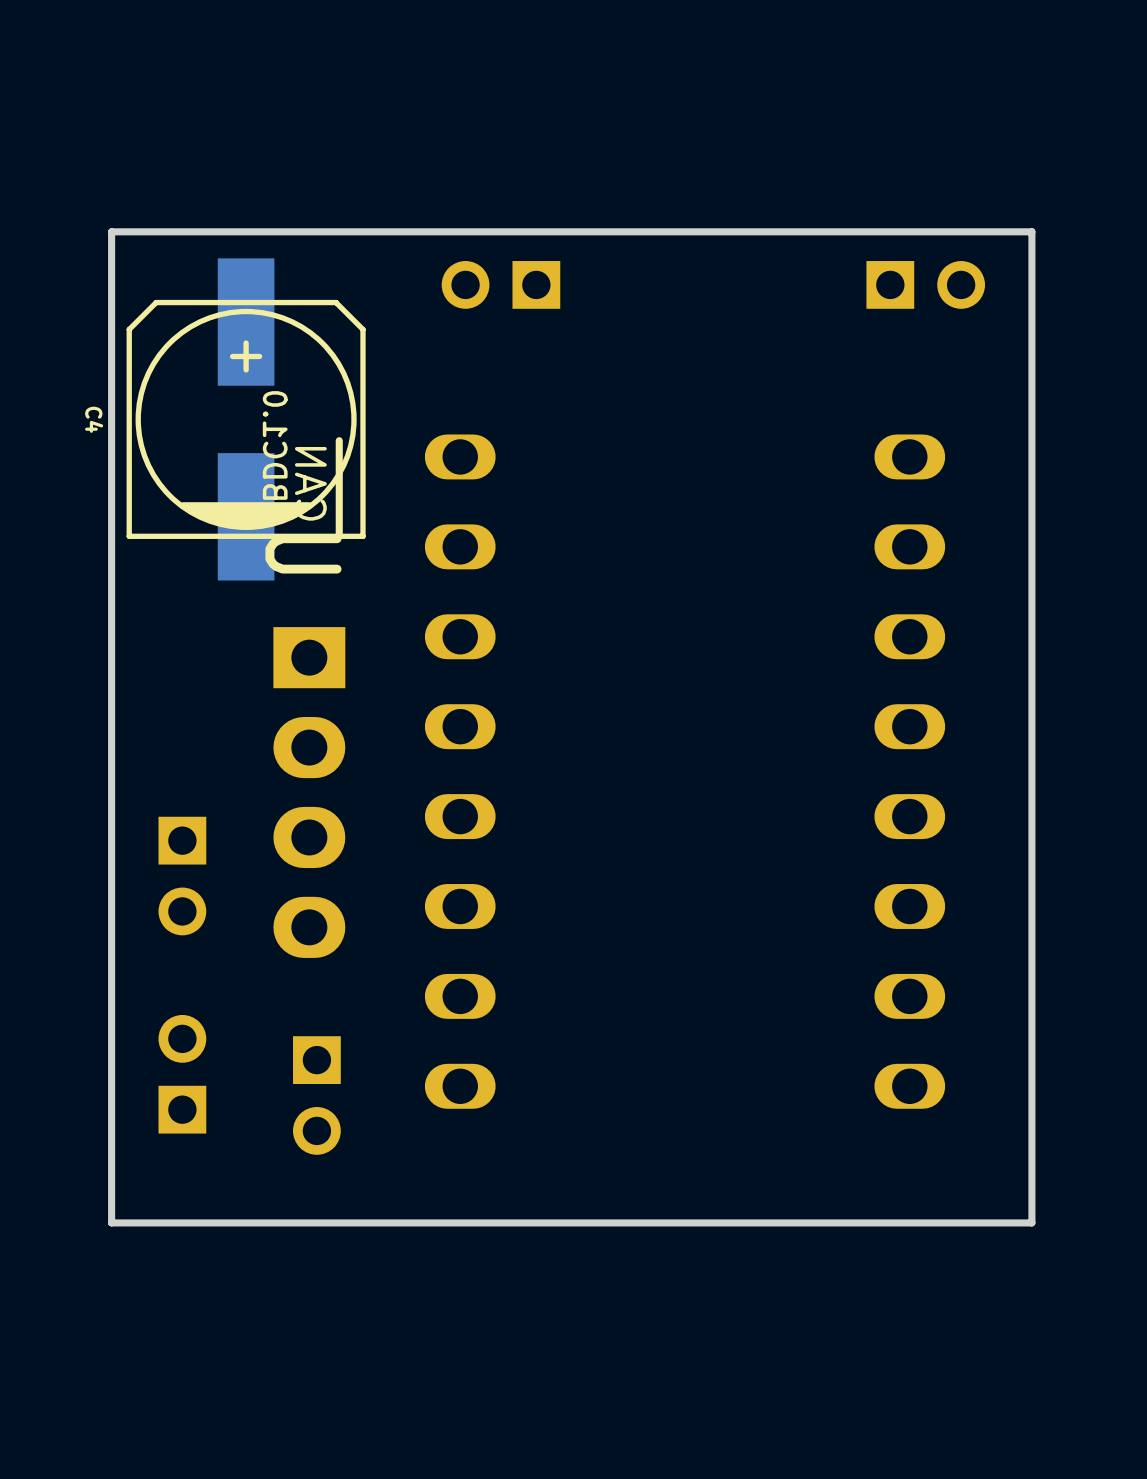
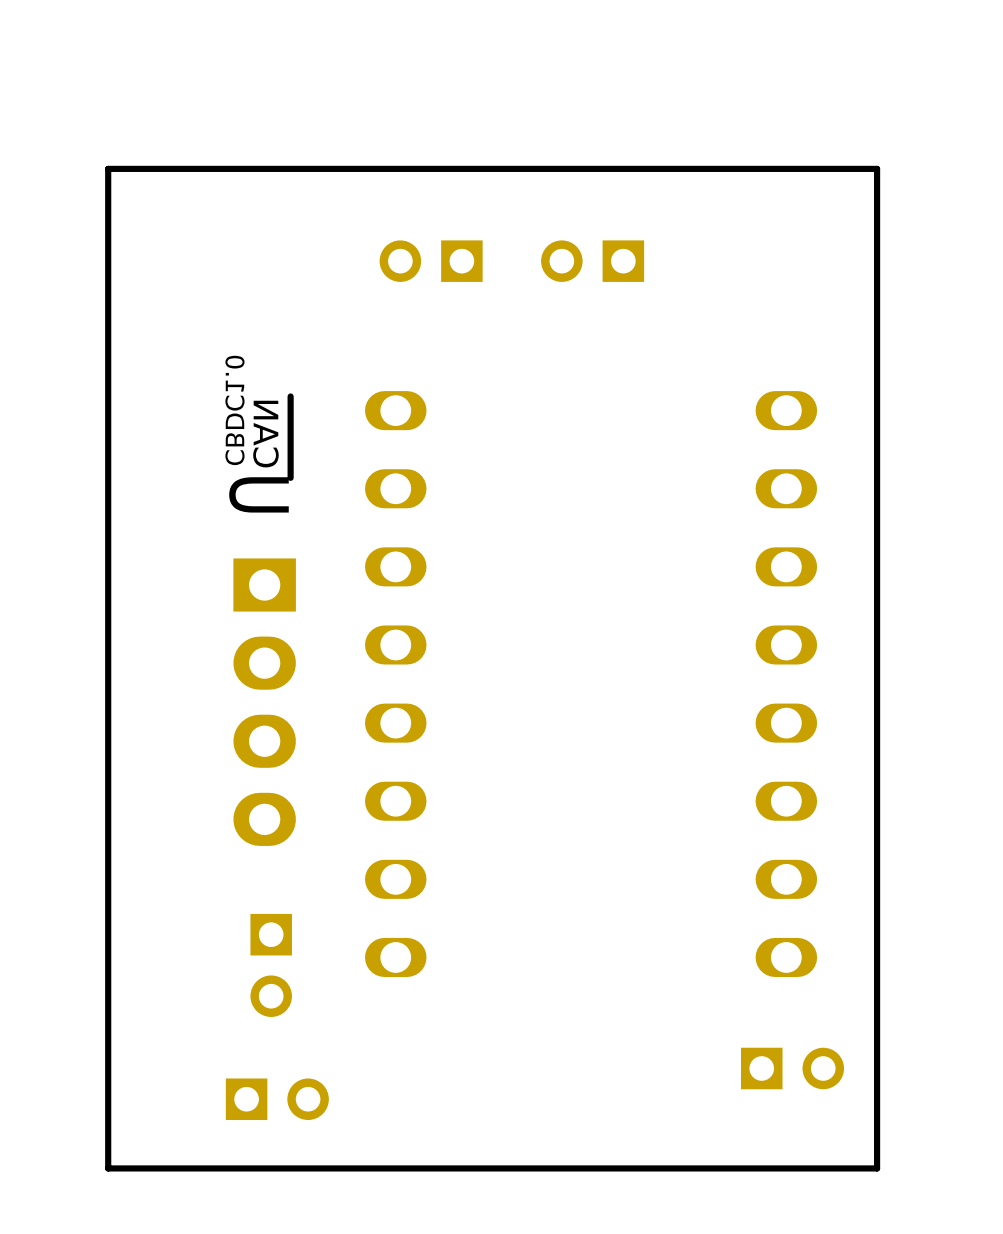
board edge: (1031, 231) (1031, 1222) (111, 1222) (111, 231) (1031, 231) -> (877, 168) (877, 1168) (108, 1168) (108, 168) (877, 168)
part rotation: 0° (925, 284) -> 180° (592, 261)
part position: (925, 284) -> (592, 261)
C4: (246, 419) -> none
part: (182, 876) -> none
part: (182, 1074) -> none
part: none -> (792, 1068)
part: none -> (277, 1099)

